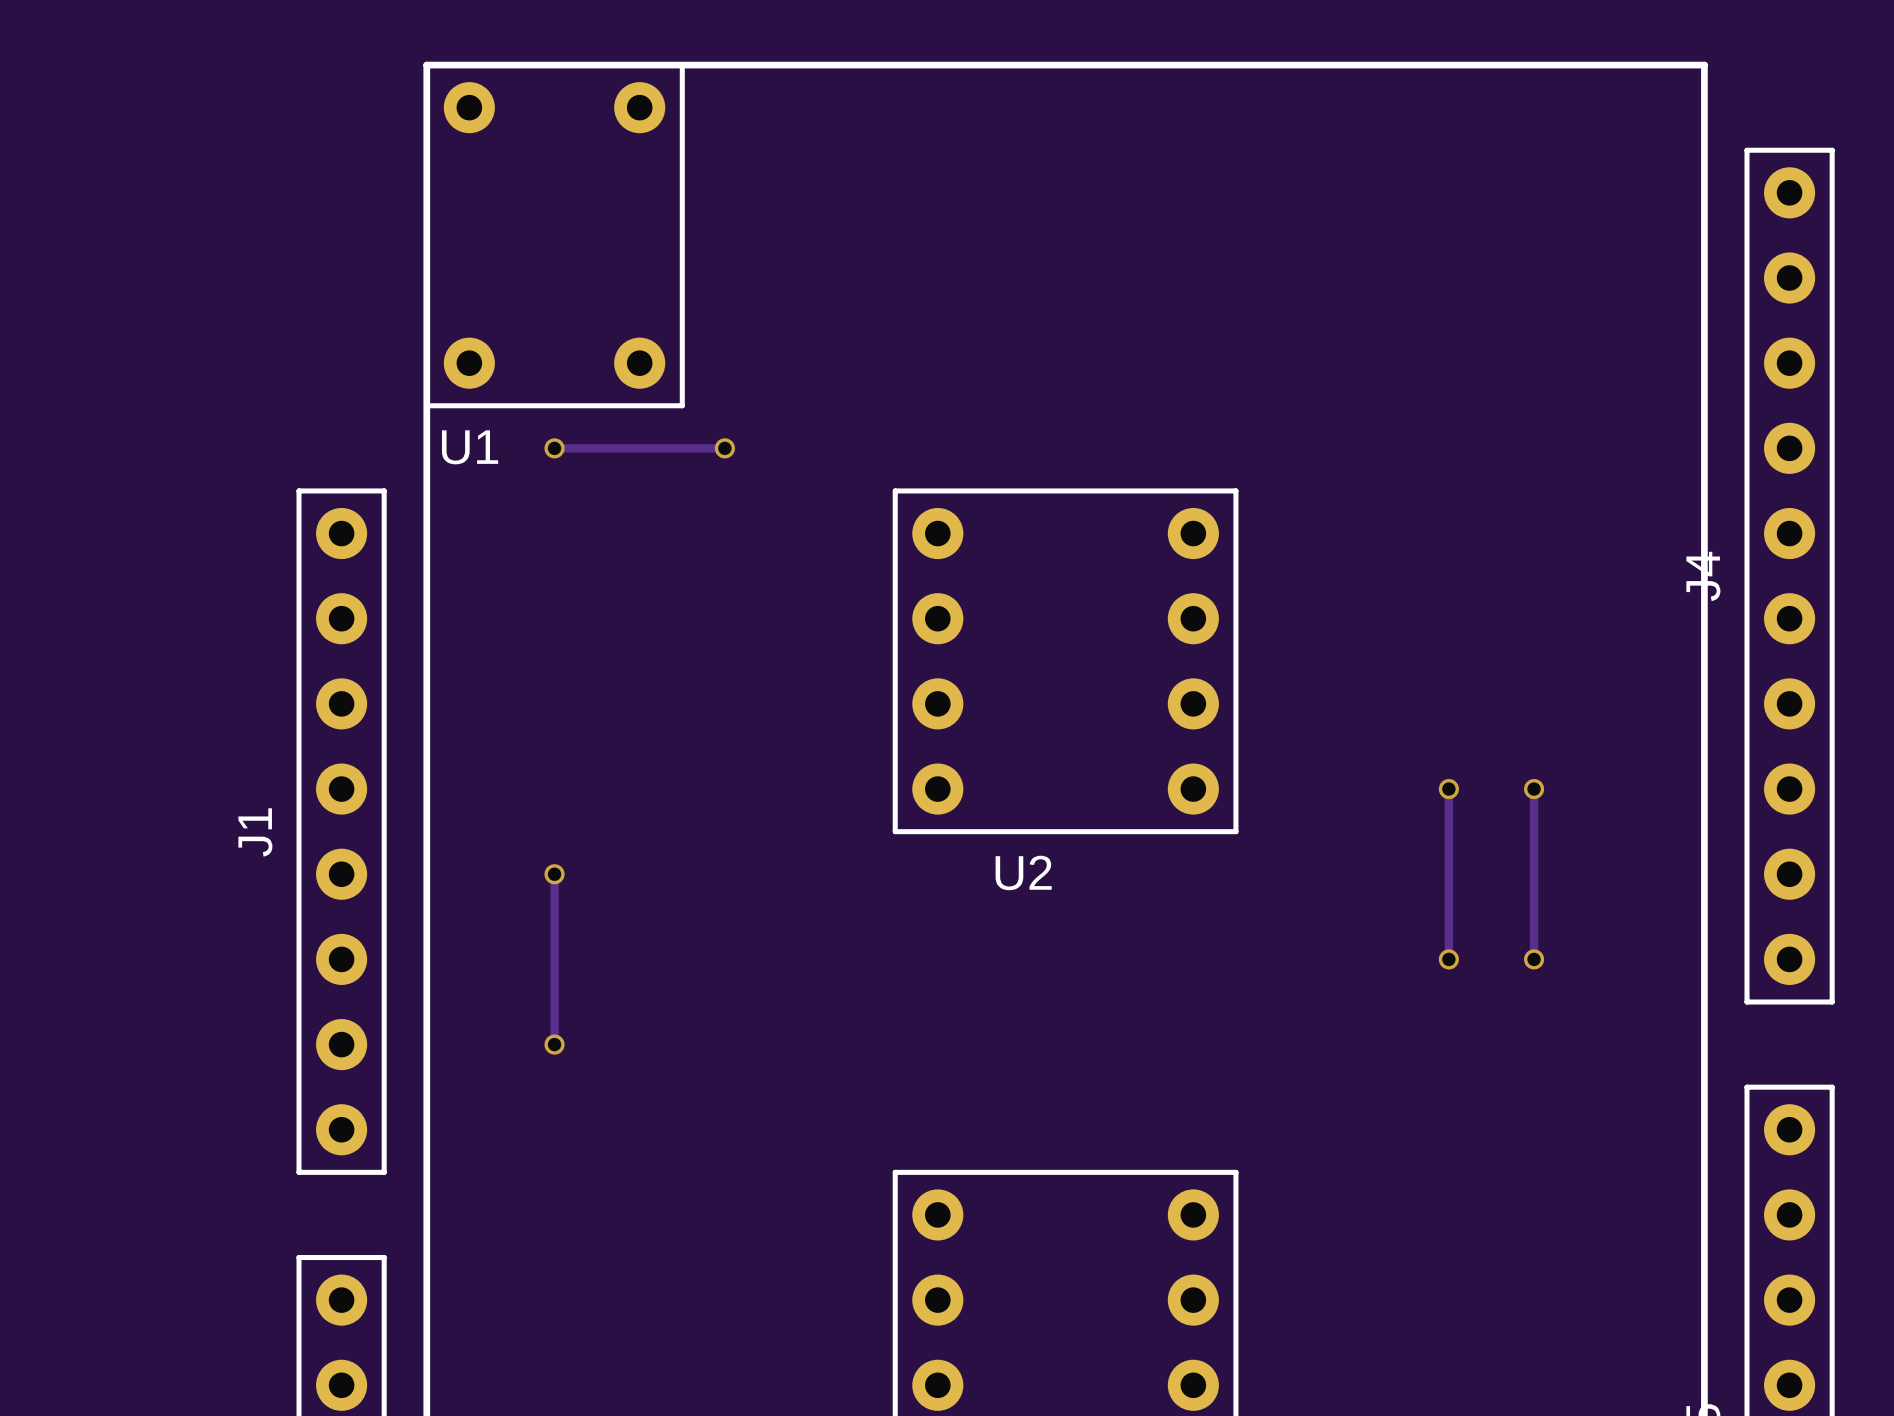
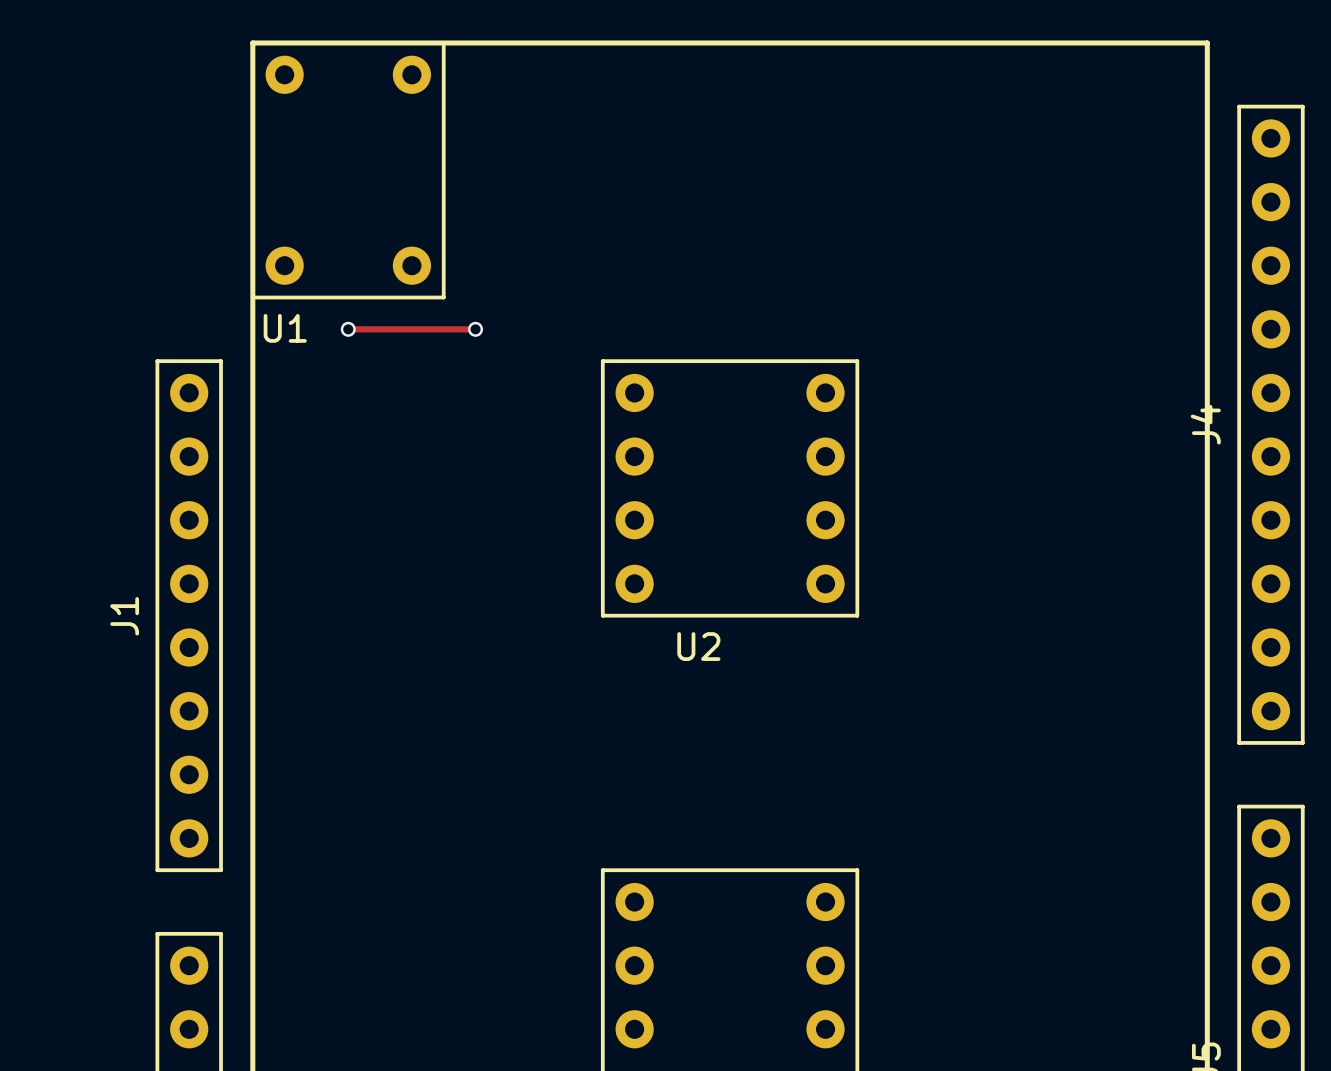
track: (1448, 789) (1448, 959) -> none
via: (1448, 789) -> none
track: (1534, 789) (1534, 959) -> none
via: (1534, 789) -> none
track: (554, 874) (554, 1044) -> none
via: (554, 874) -> none
via: (1448, 959) -> none
via: (1534, 959) -> none
via: (554, 1044) -> none

